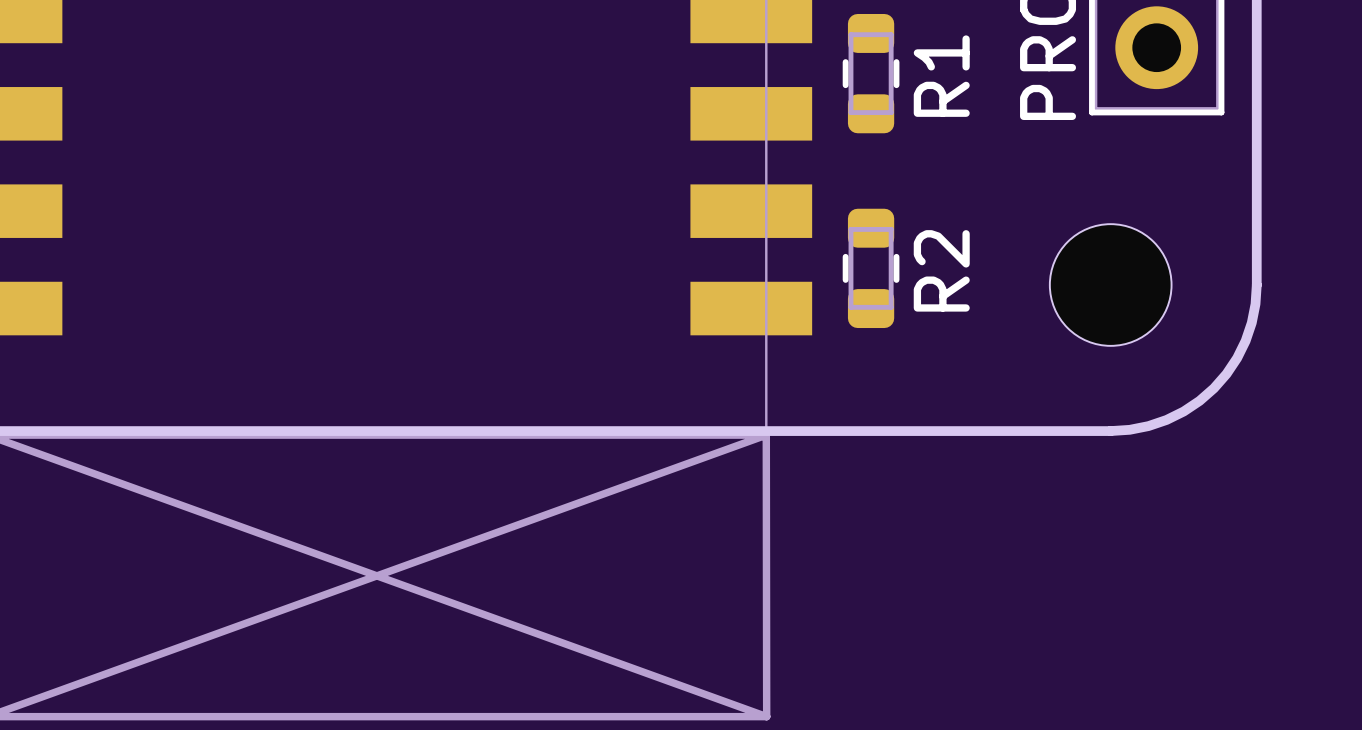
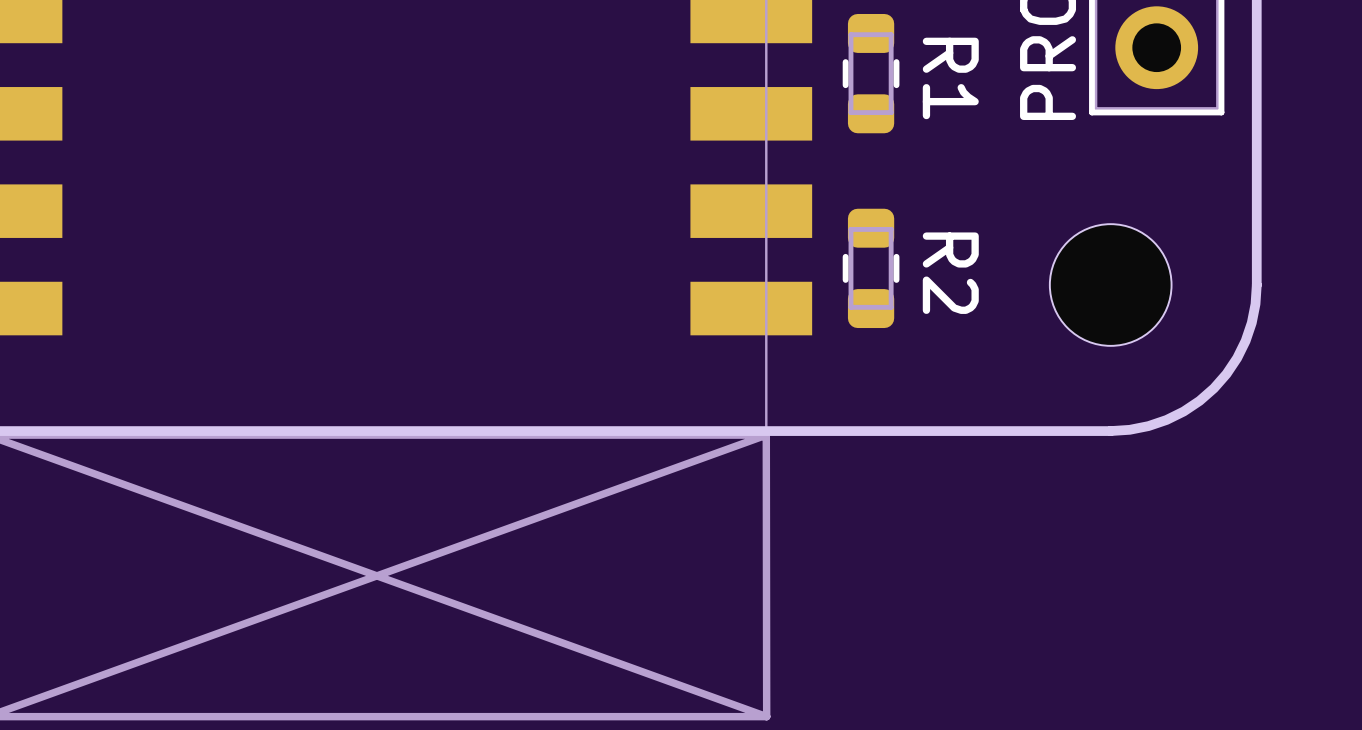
R1 name rotation: 0° (941, 76) -> 180° (950, 78)
R2 name rotation: 0° (941, 270) -> 180° (950, 273)

